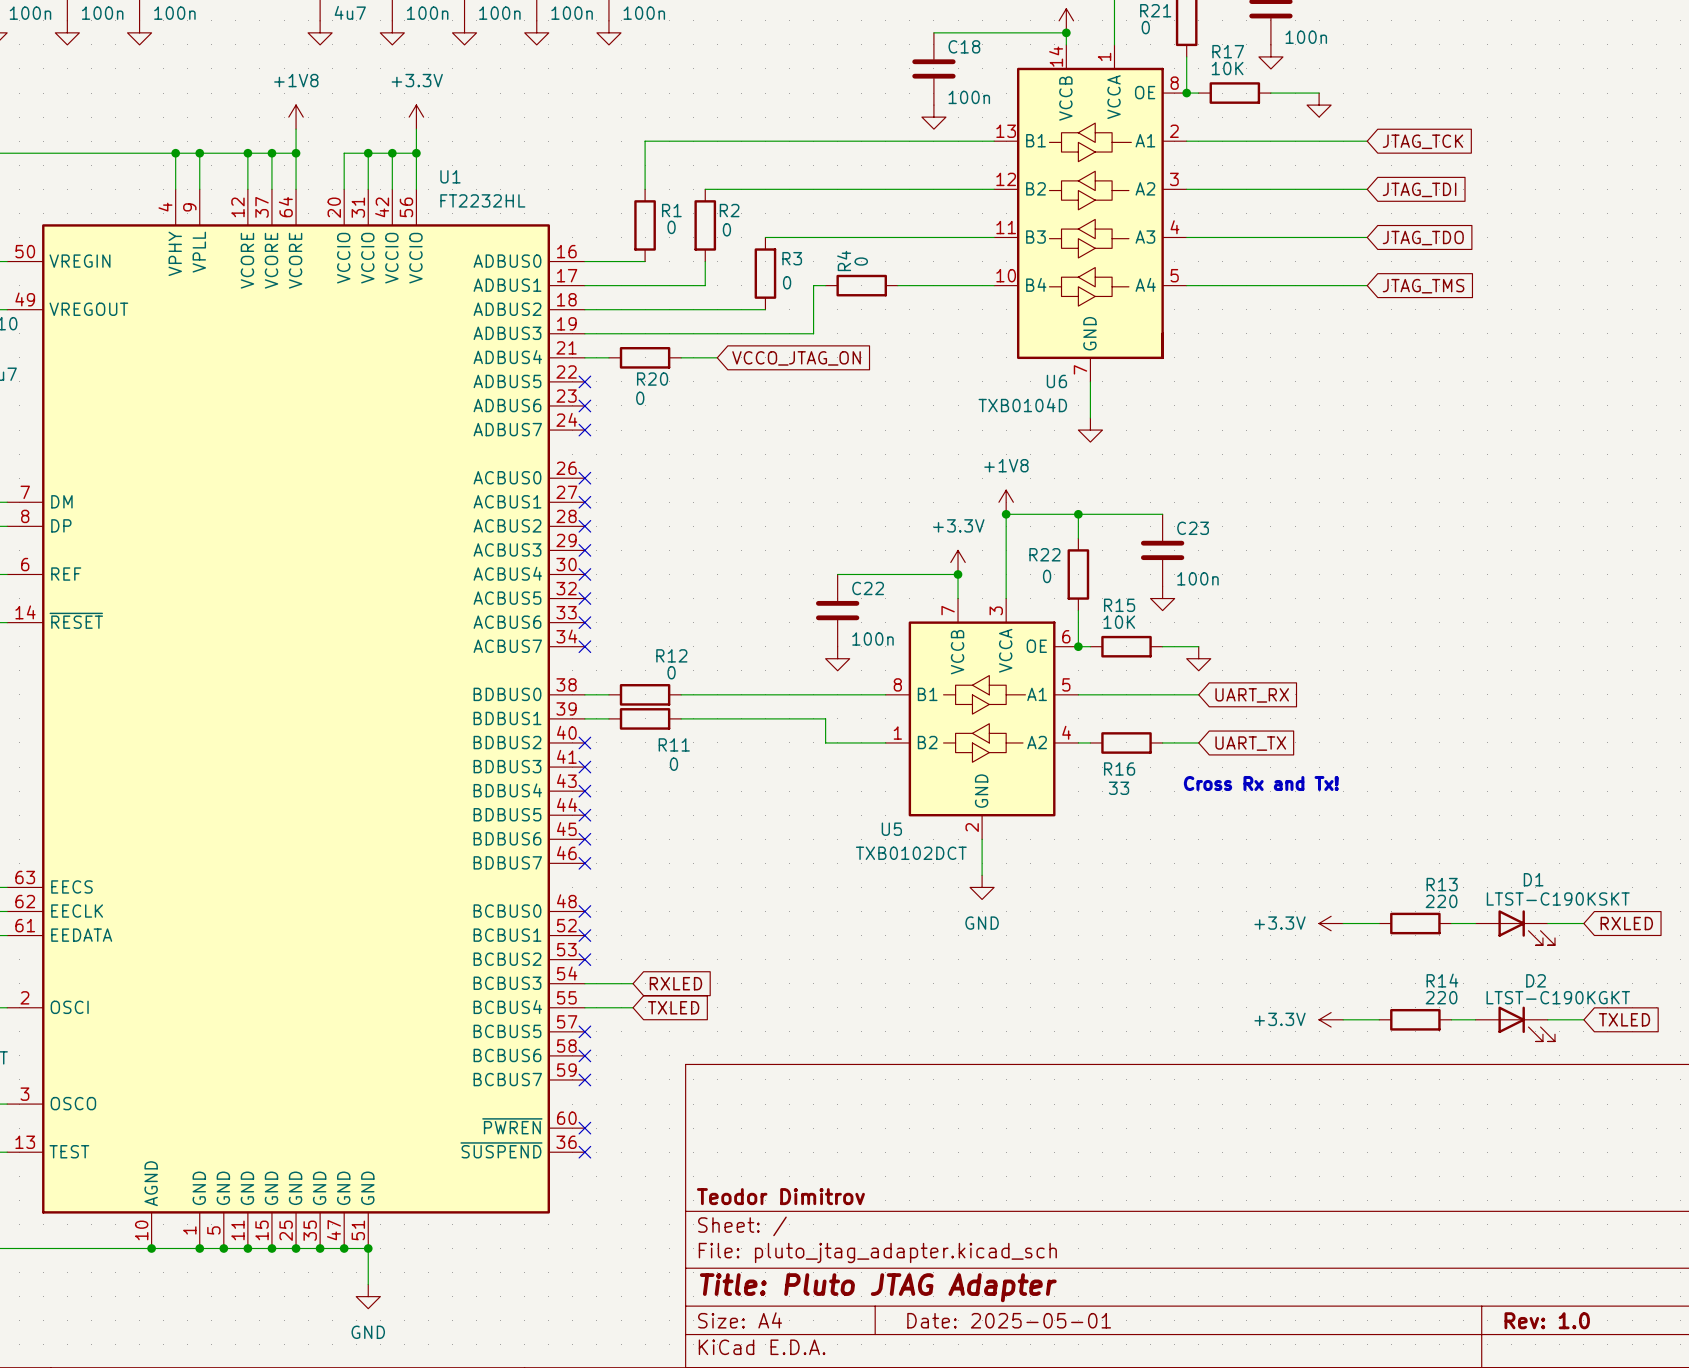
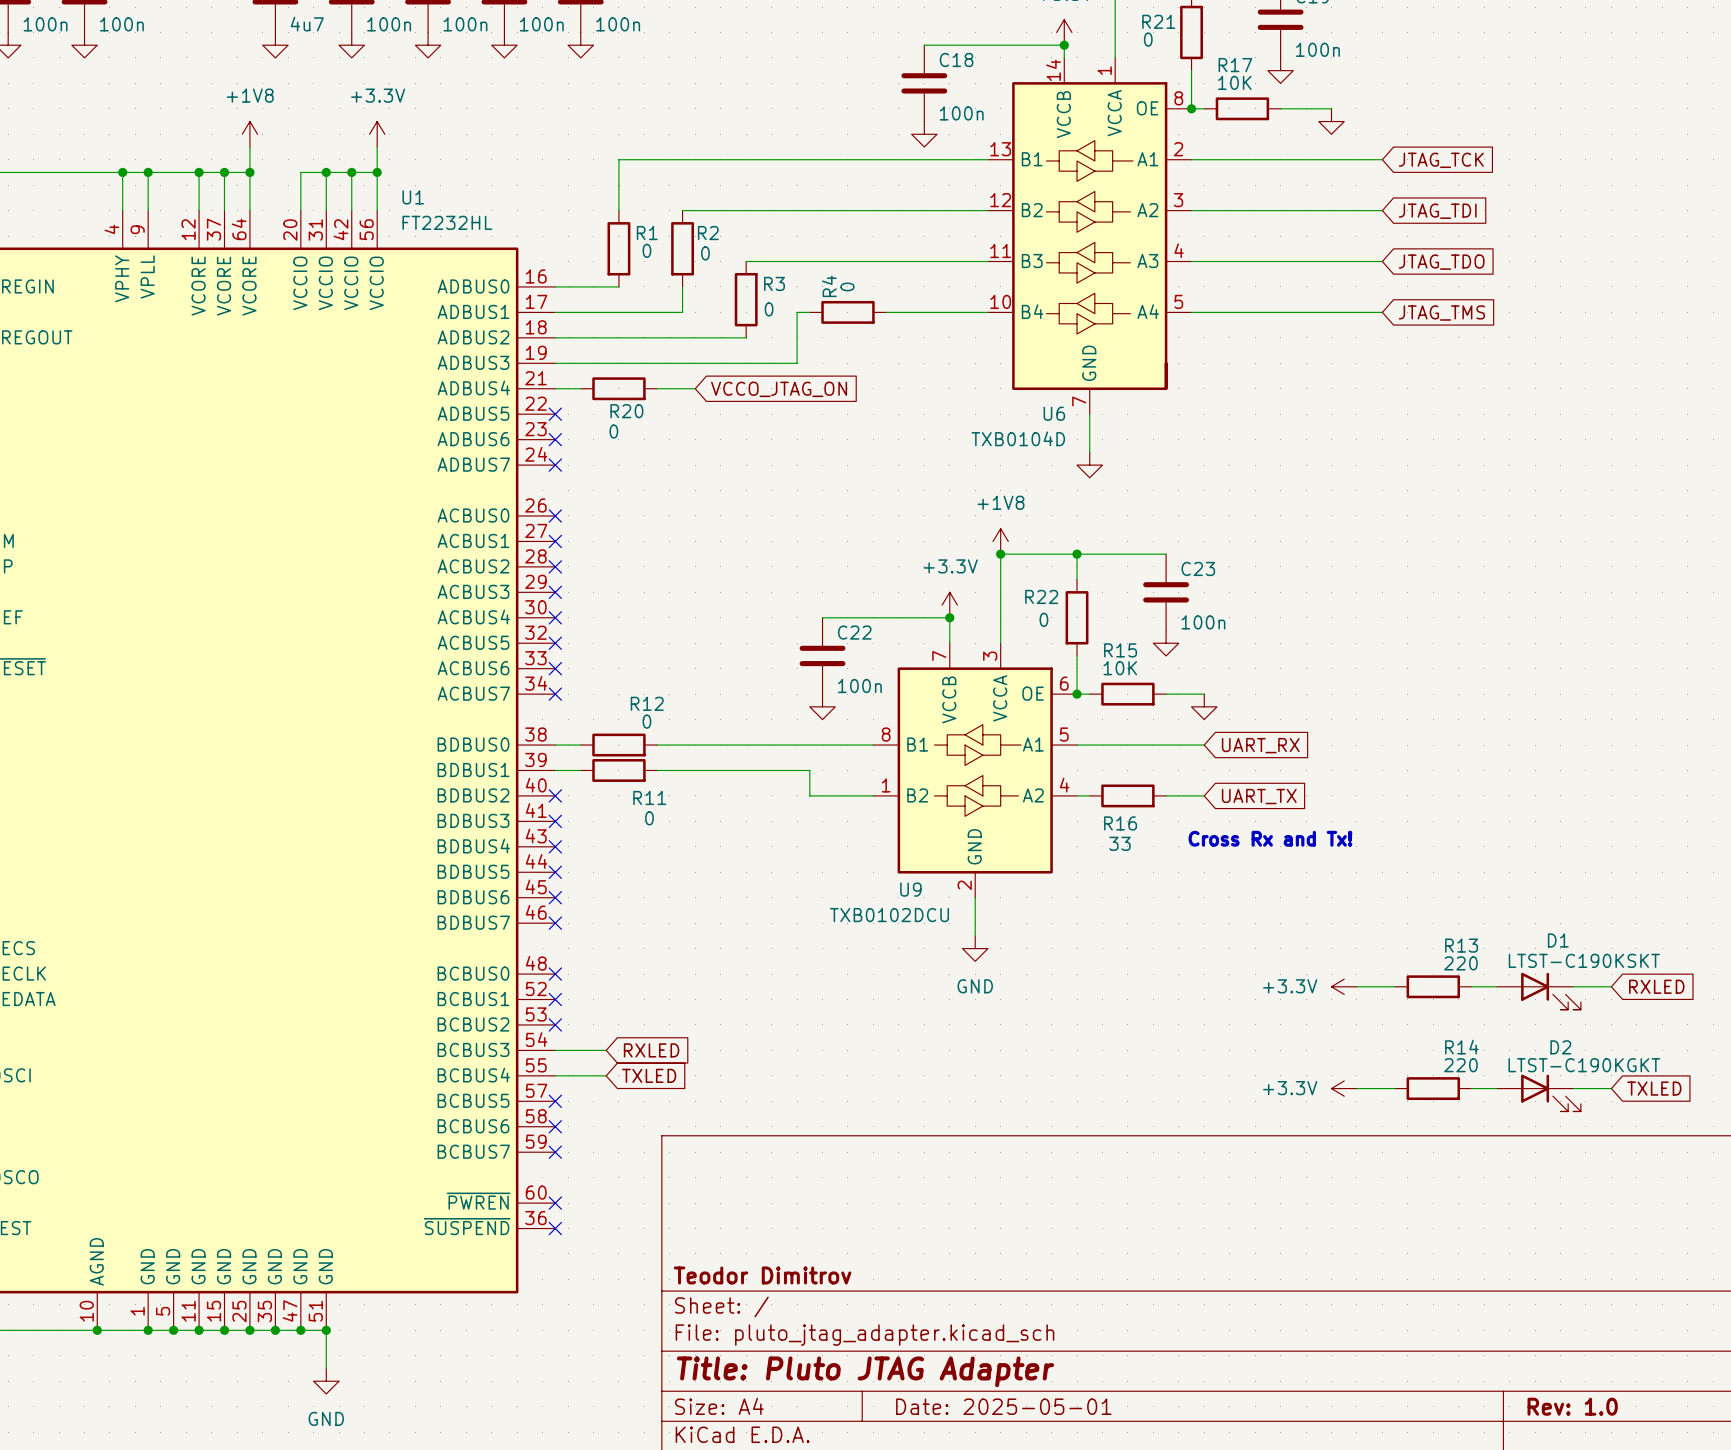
U5: TXB0102DCT (982, 718) -> none
U9: none -> TXB0102DCU (975, 770)

